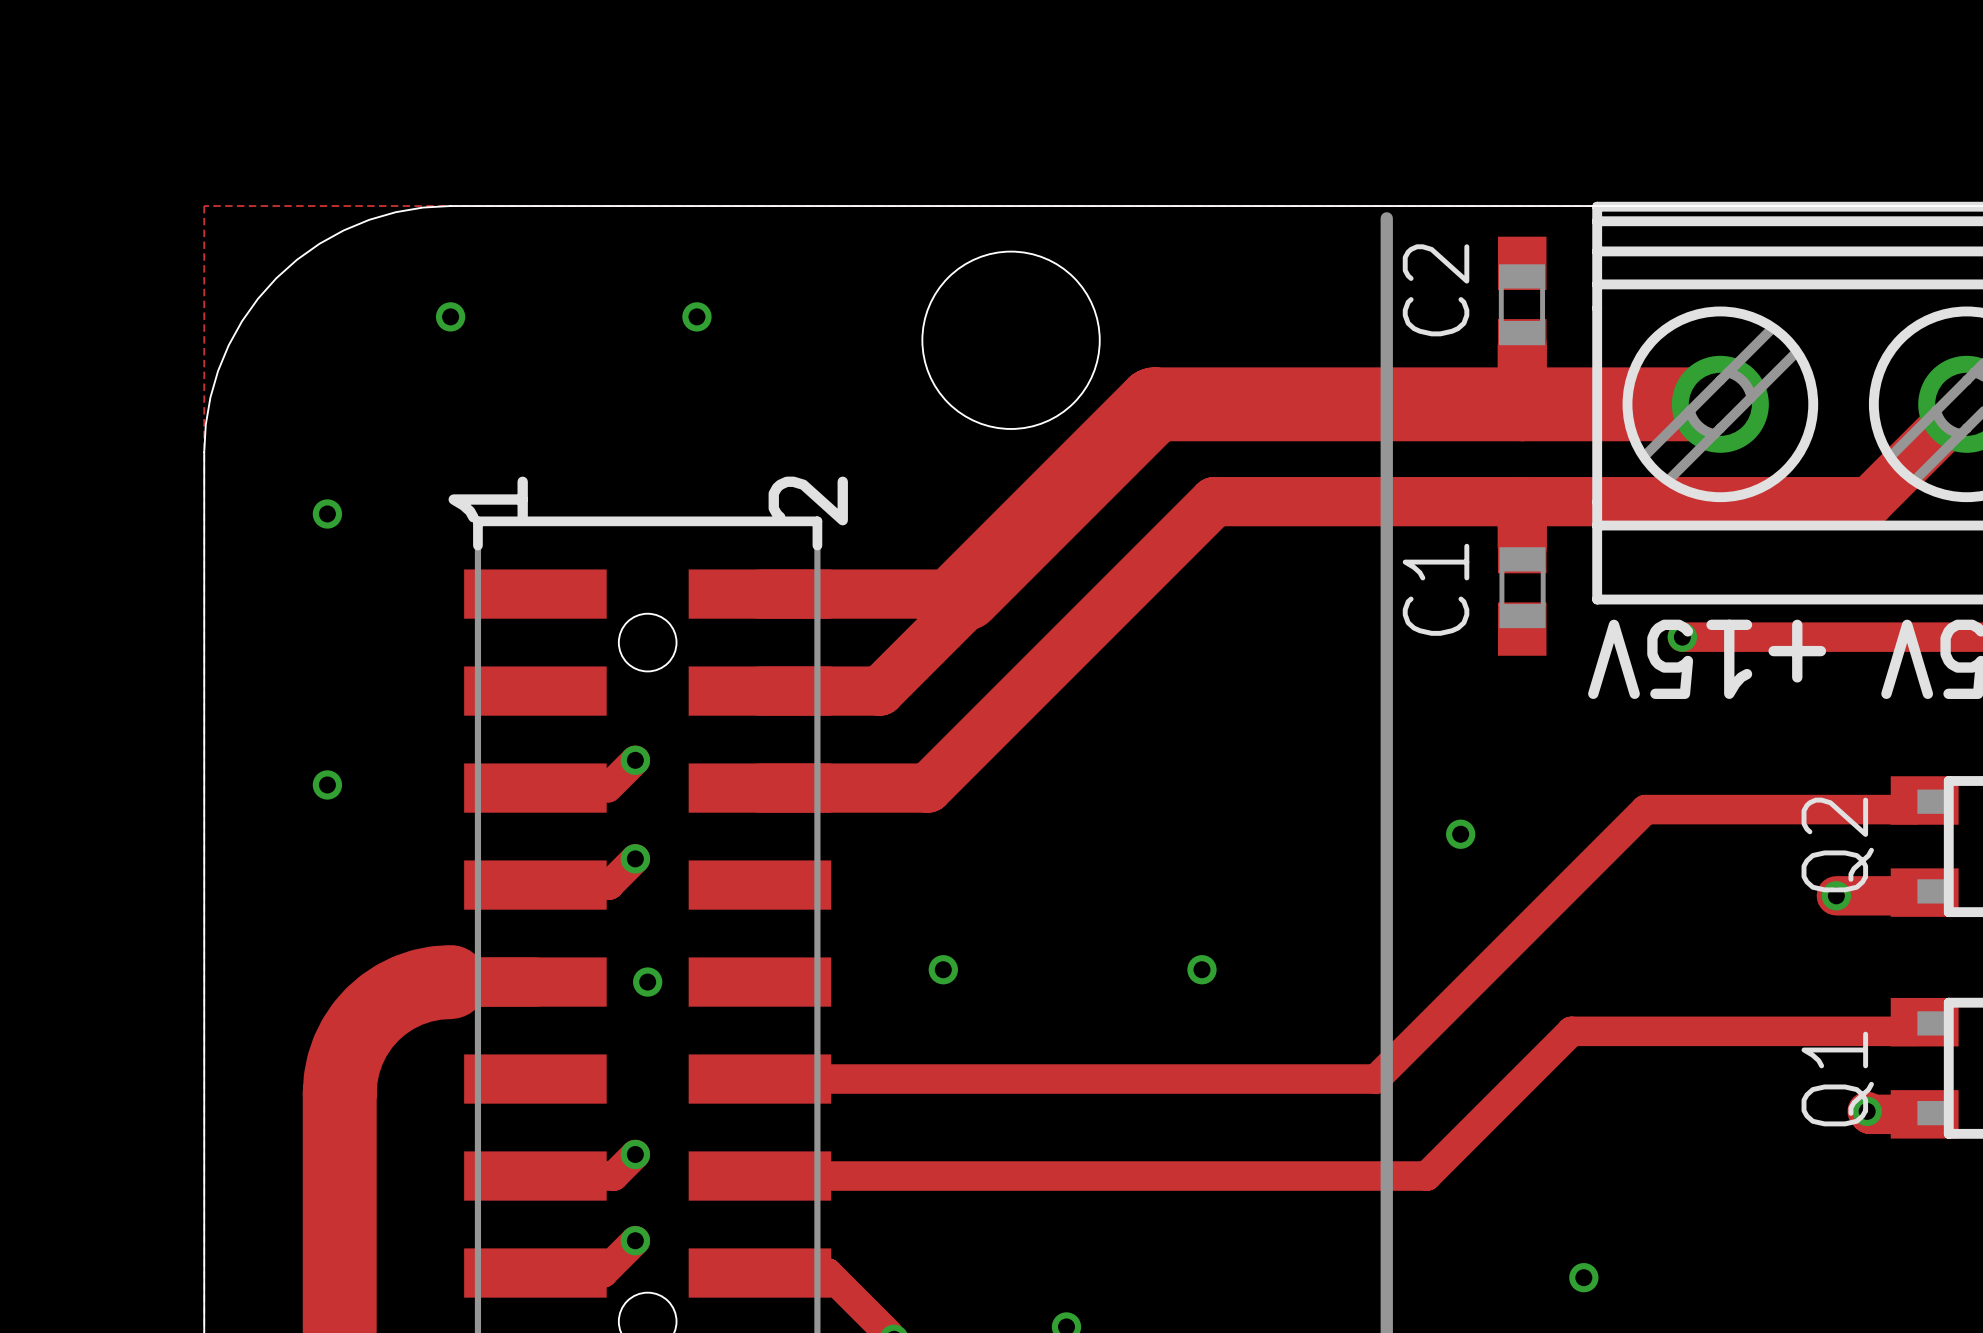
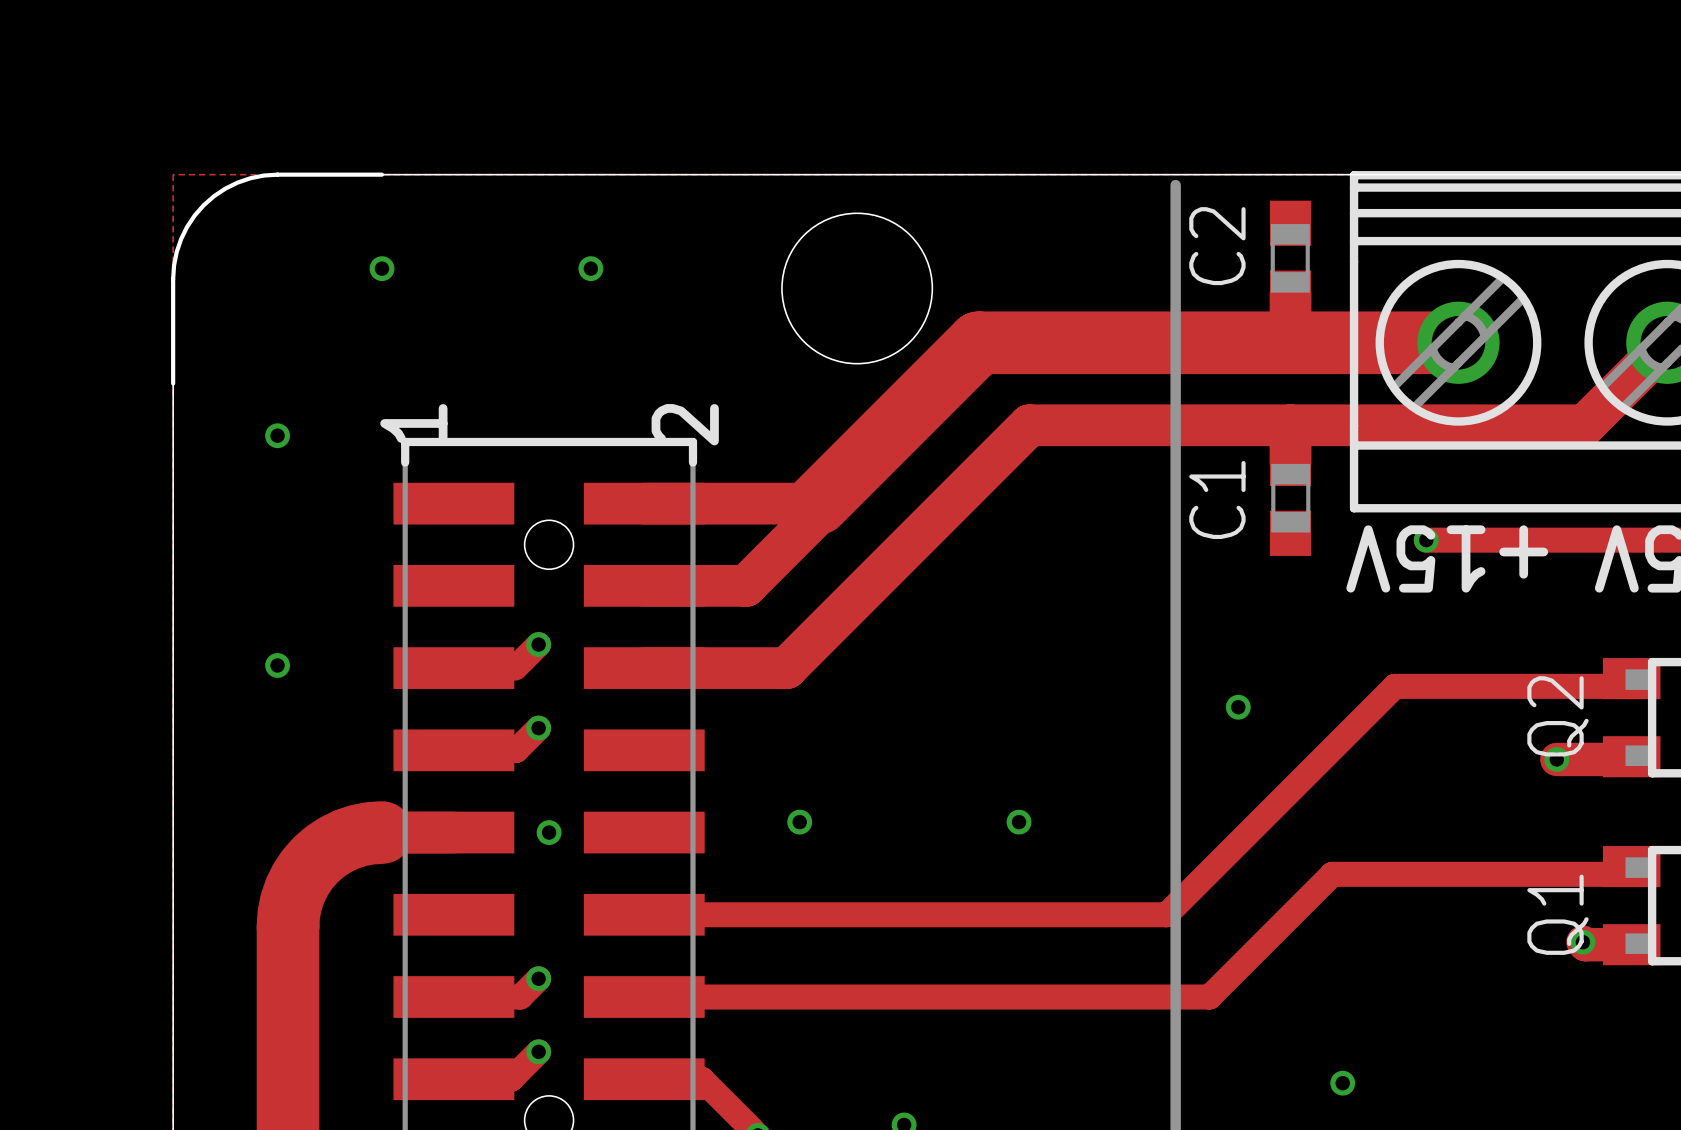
board edge: (450, 206) (423, 207) (395, 212) (369, 219) (343, 230) (319, 243) (296, 259) (276, 278) (257, 298) (241, 321) (228, 345) (218, 371) (210, 397) (205, 424) (204, 452) -> (382, 174) (263, 175) (237, 182) (214, 196) (203, 205) (194, 215) (181, 239) (174, 265) (173, 383)

